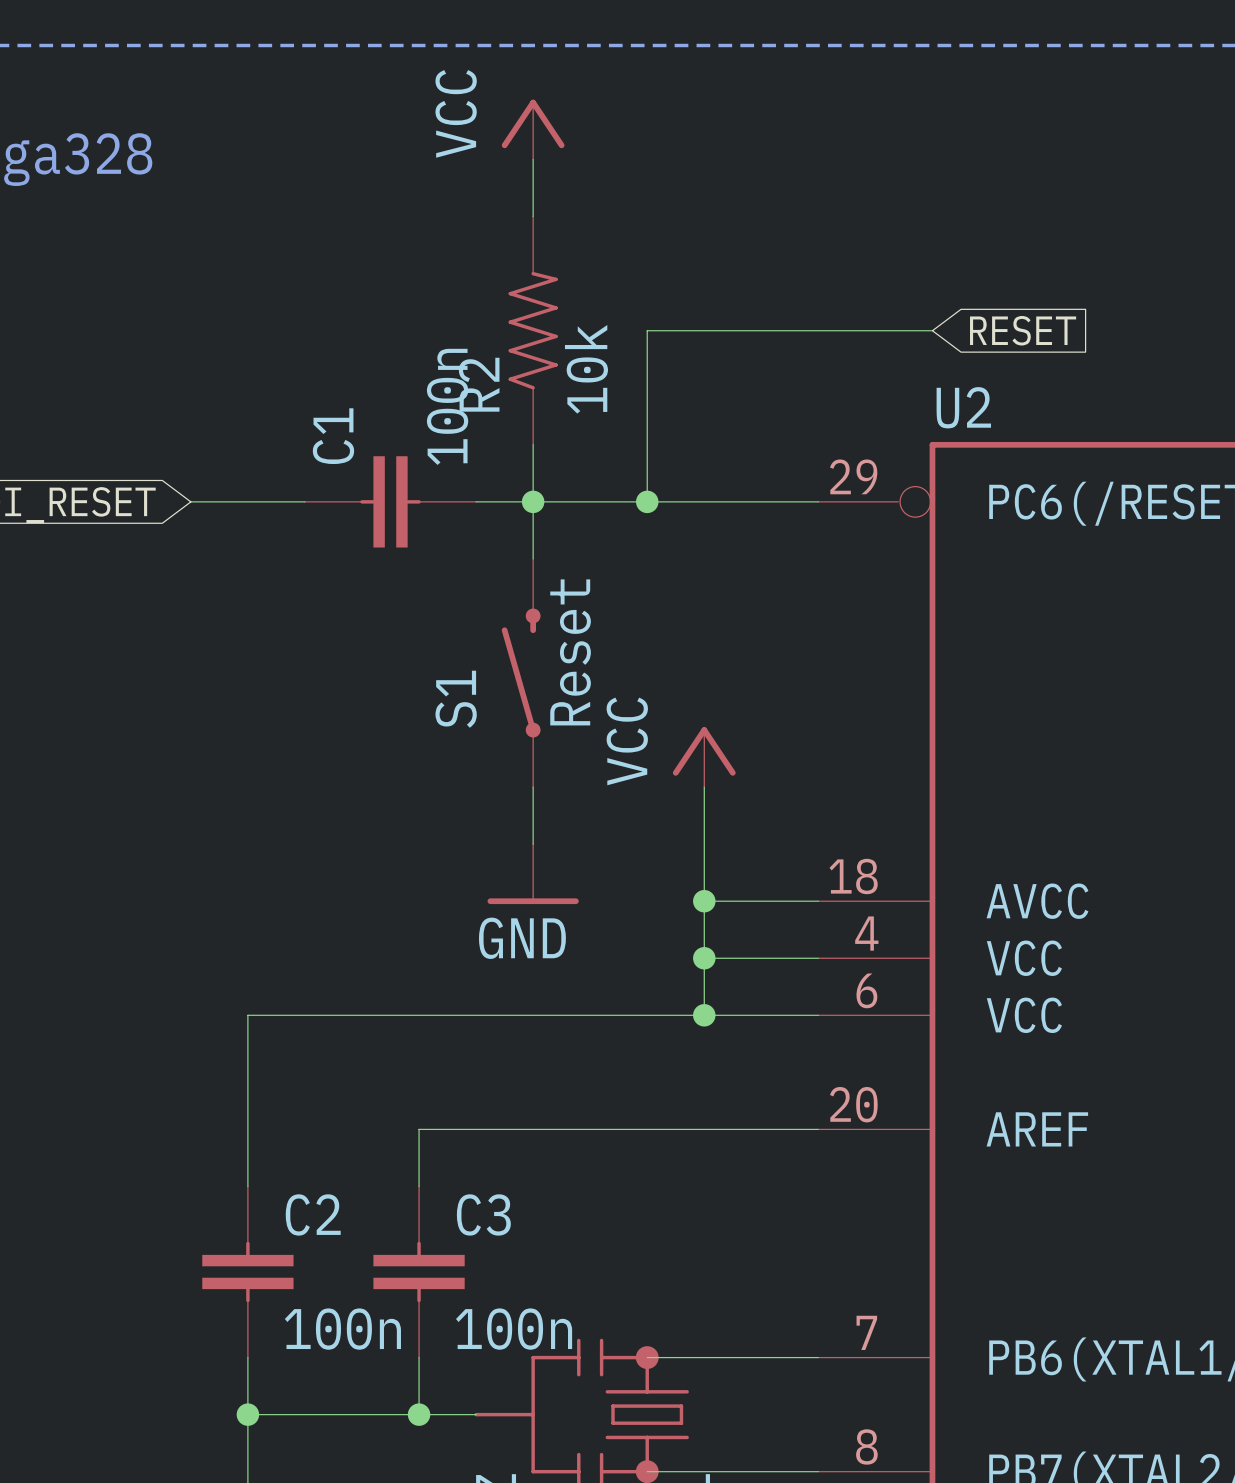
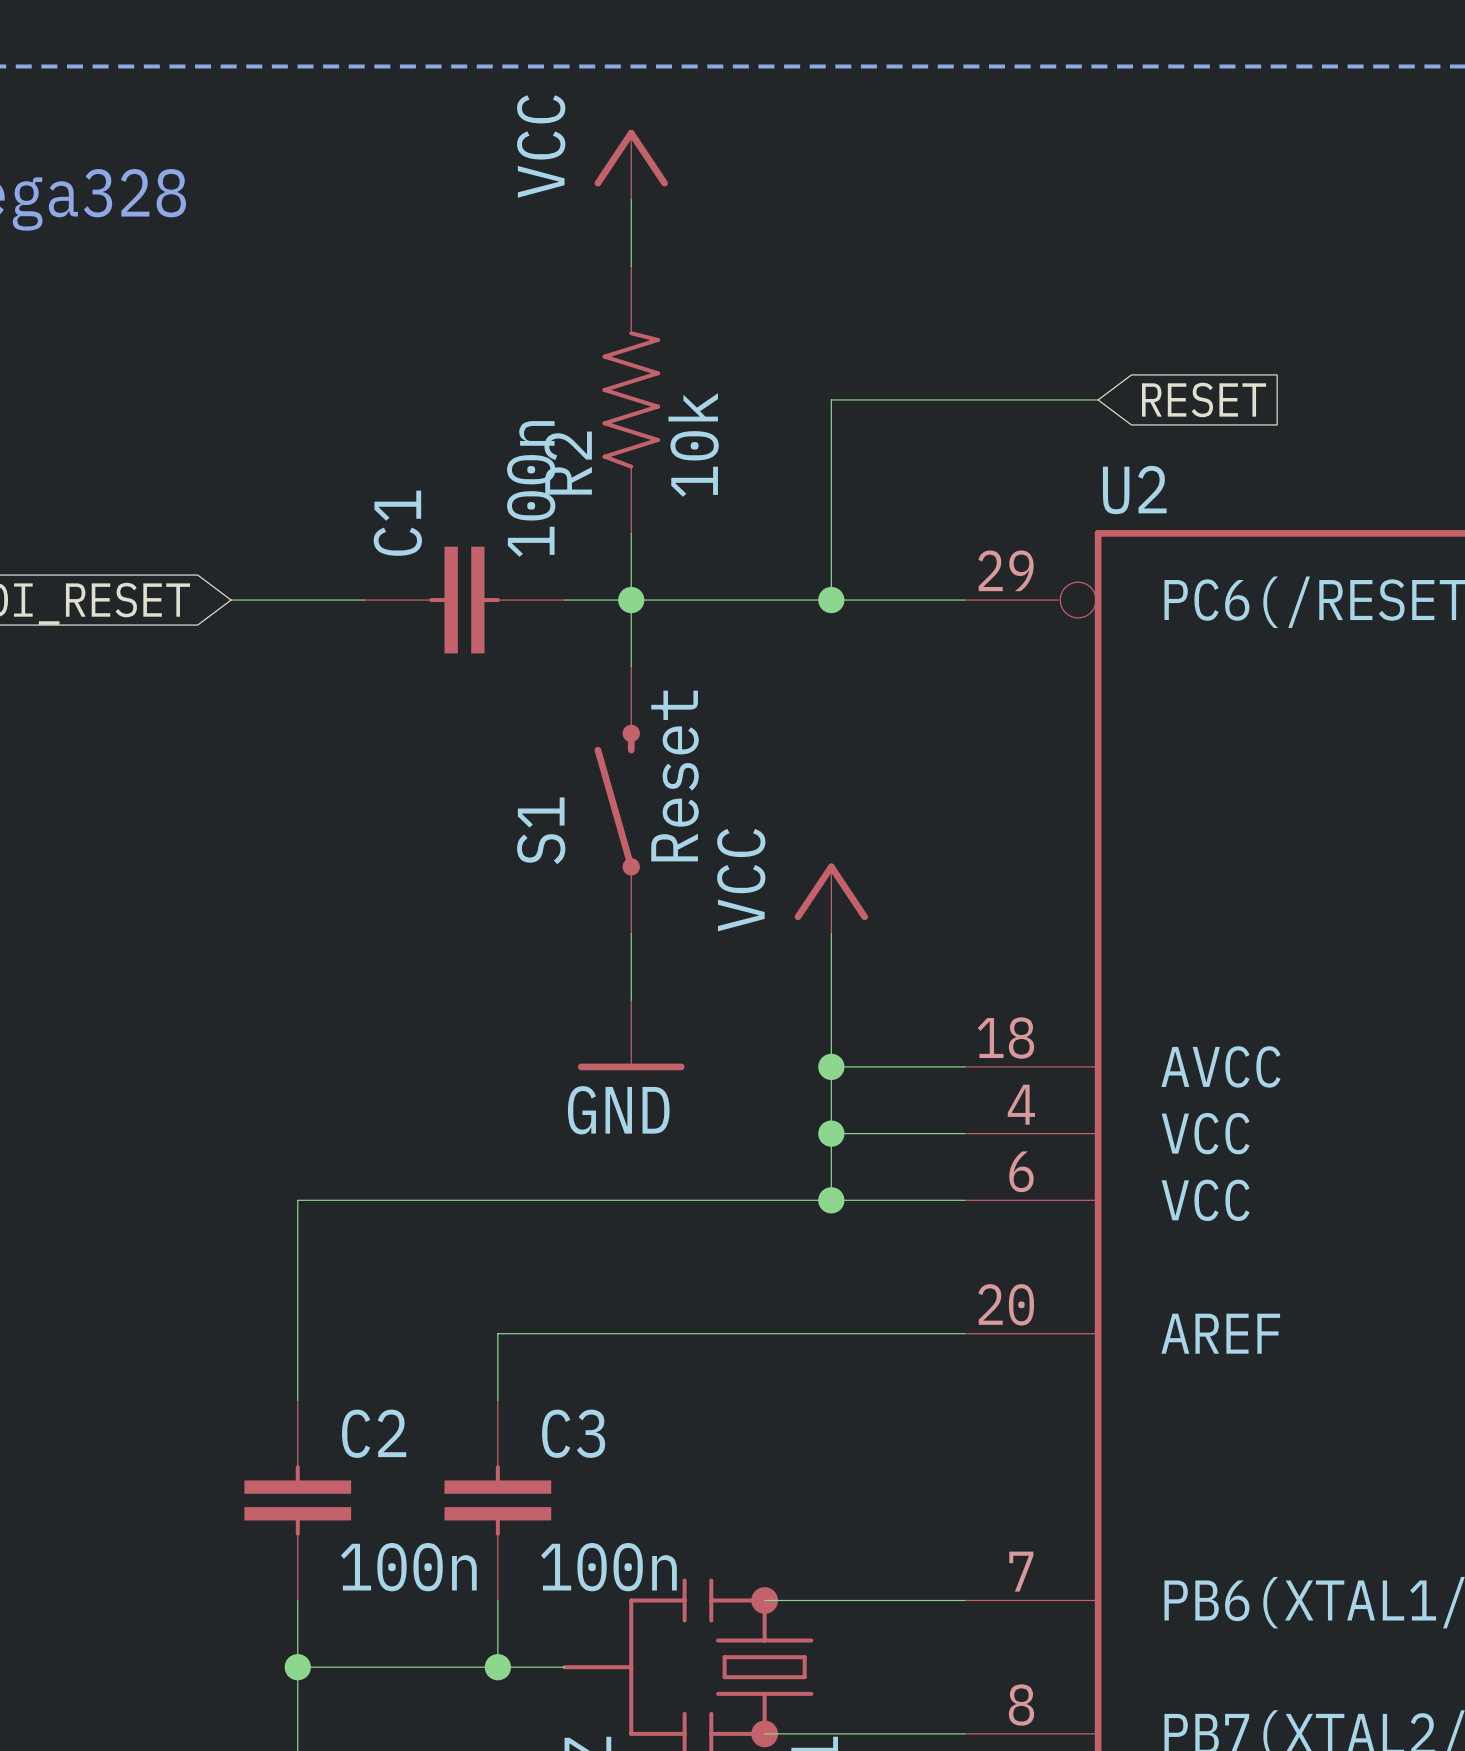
wire: (704, 330) (647, 330) (647, 501) -> (831, 399) (831, 600)
junction position: (647, 501) -> (831, 600)

